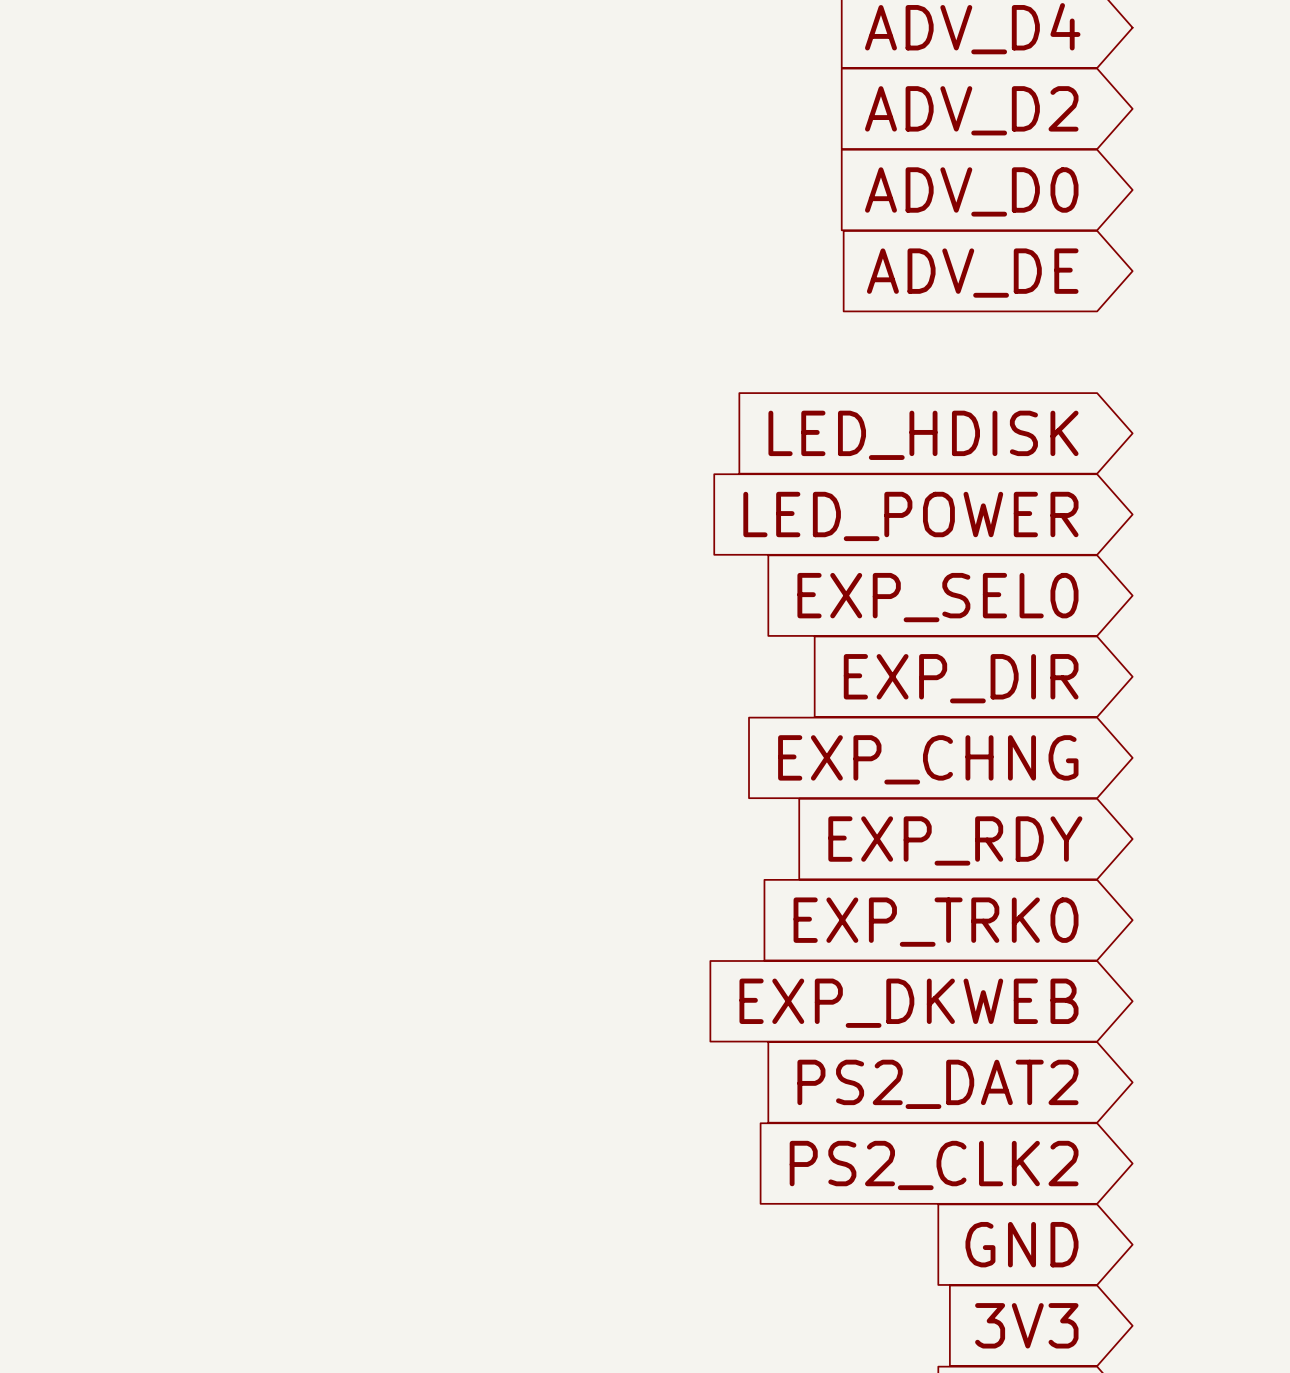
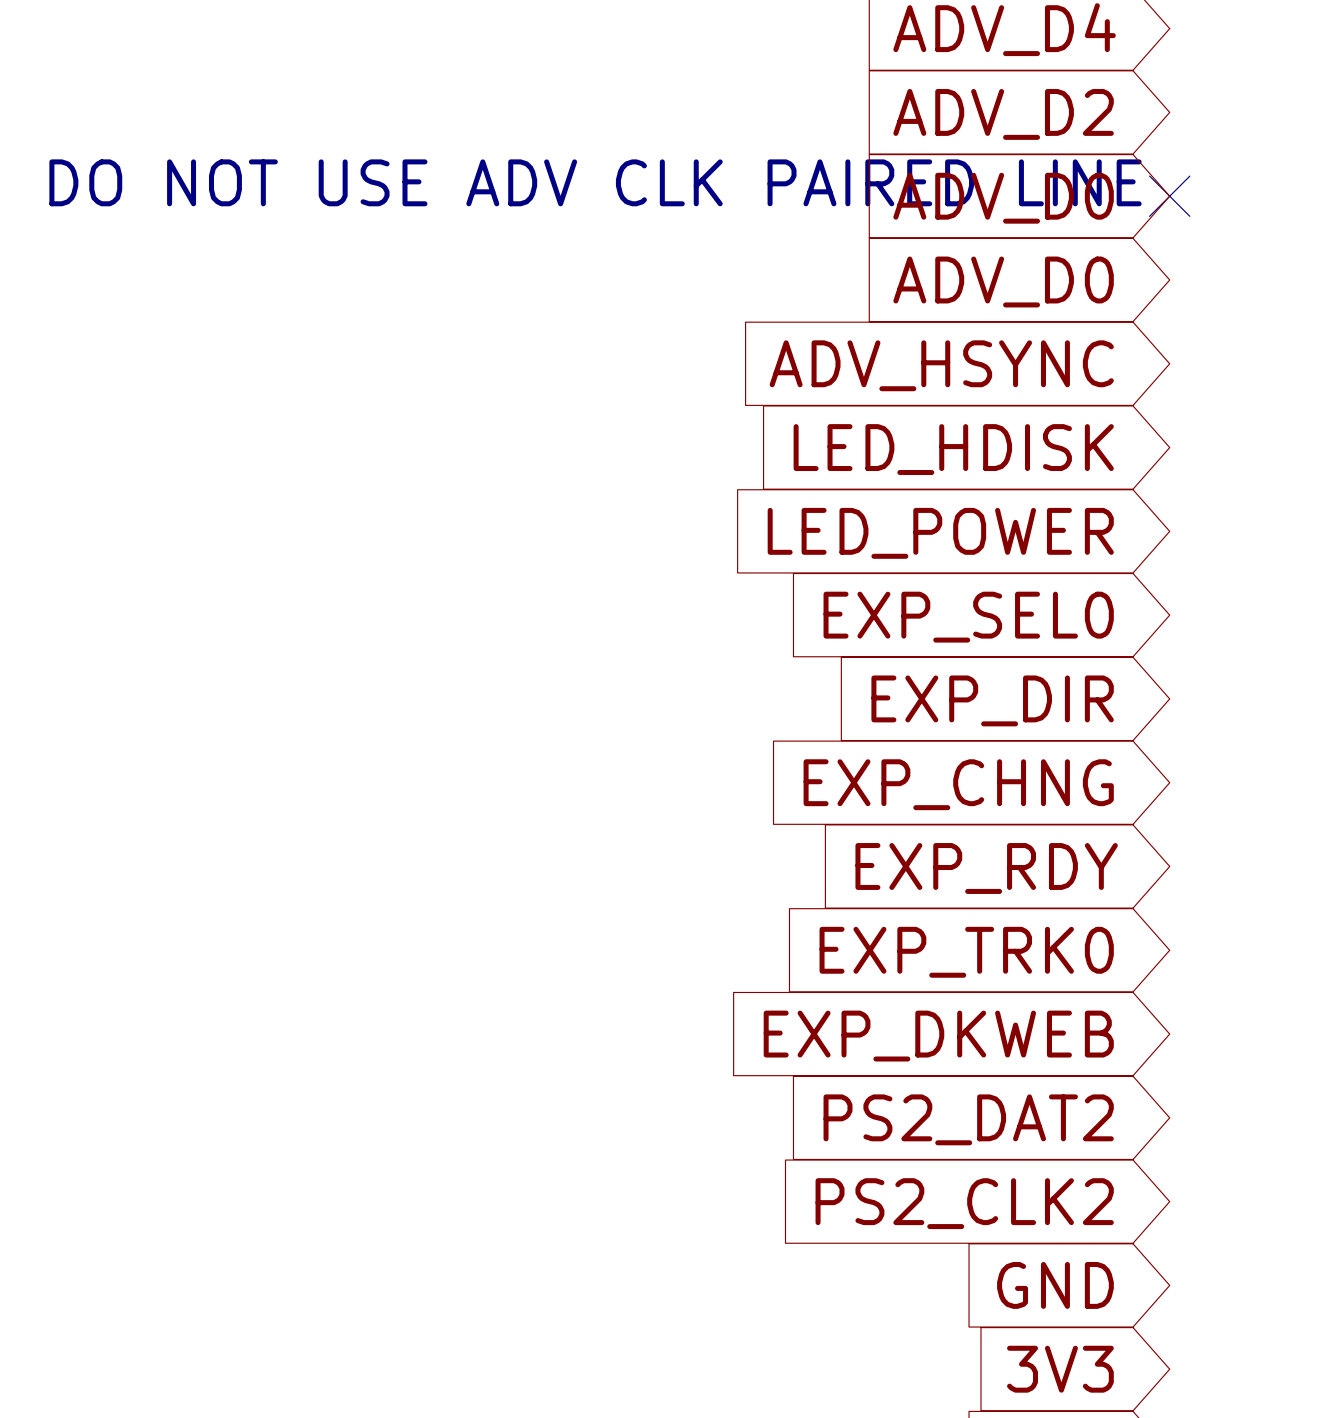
text: none -> DO NOT USE ADV CLK PAIRED LINE (595, 182)
no-connect mark: none -> (1169, 196)
global label: ADV_DE (972, 273) -> ADV_D0 (1003, 281)
global label: none -> ADV_HSYNC (941, 365)

